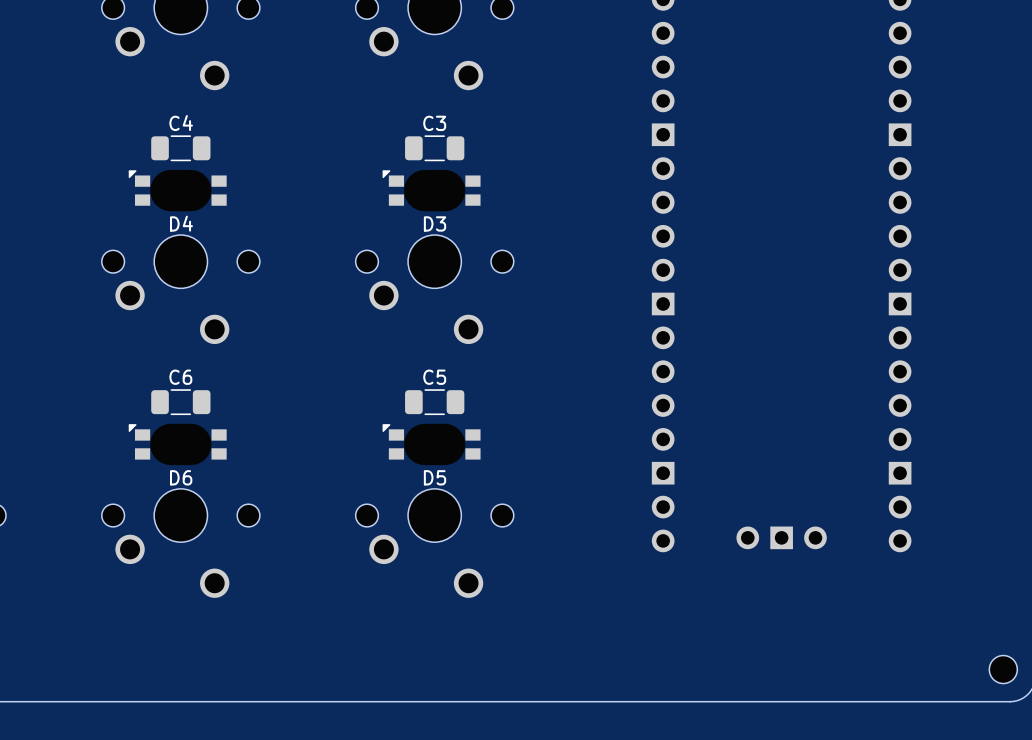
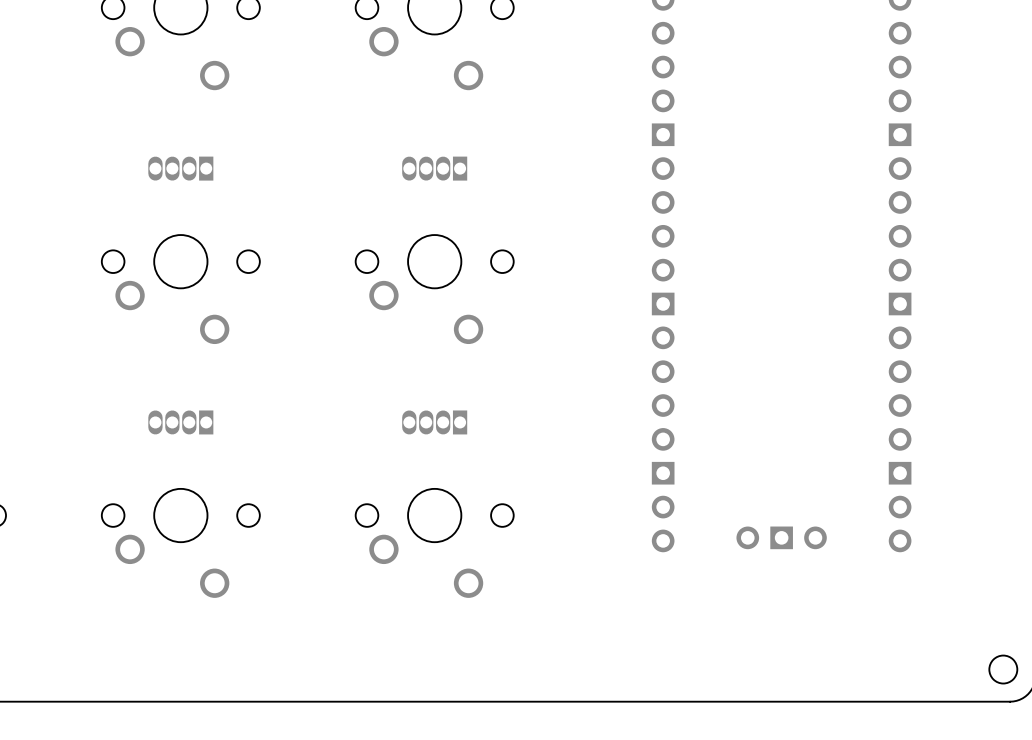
C4: (180, 148) -> none
C3: (434, 148) -> none
part: none -> (180, 168)
part: none -> (434, 168)
D4: (177, 190) -> none
D3: (431, 190) -> none
C6: (180, 402) -> none
C5: (434, 402) -> none
part: none -> (180, 422)
part: none -> (434, 422)
D6: (177, 444) -> none
D5: (431, 444) -> none

